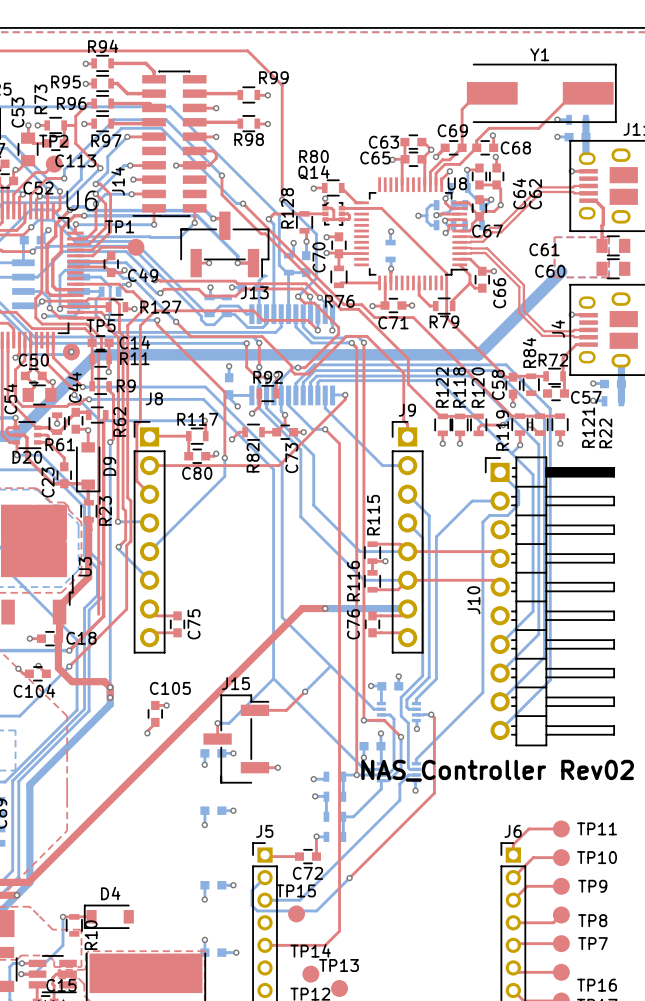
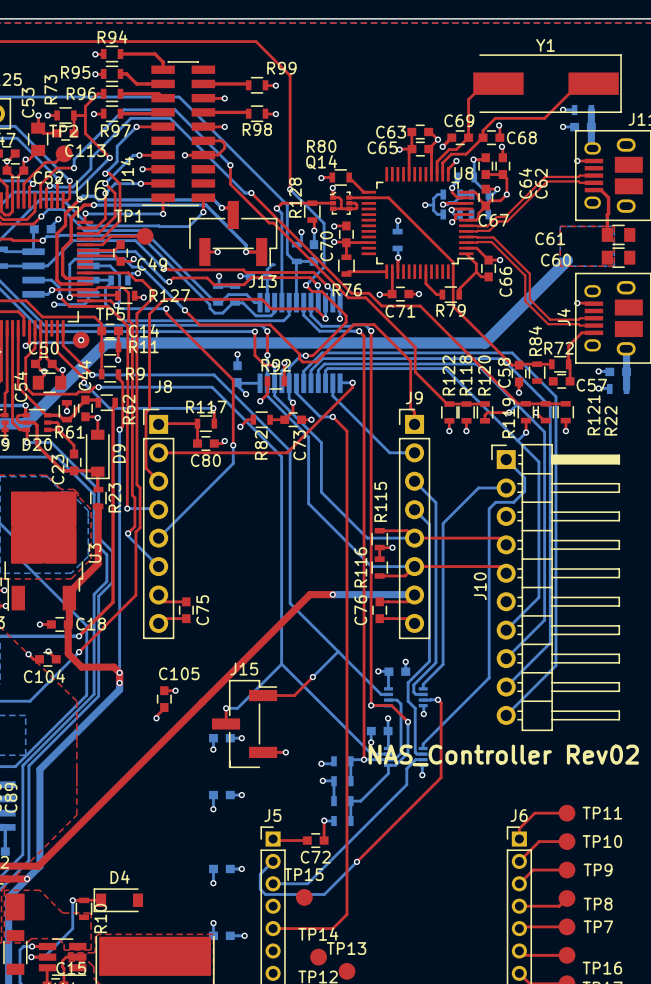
top track: (41, 211) (41, 292) (35, 298) (35, 317) (42, 324) (86, 324) (101, 338) (101, 349) (98, 352) (98, 614) -> none

